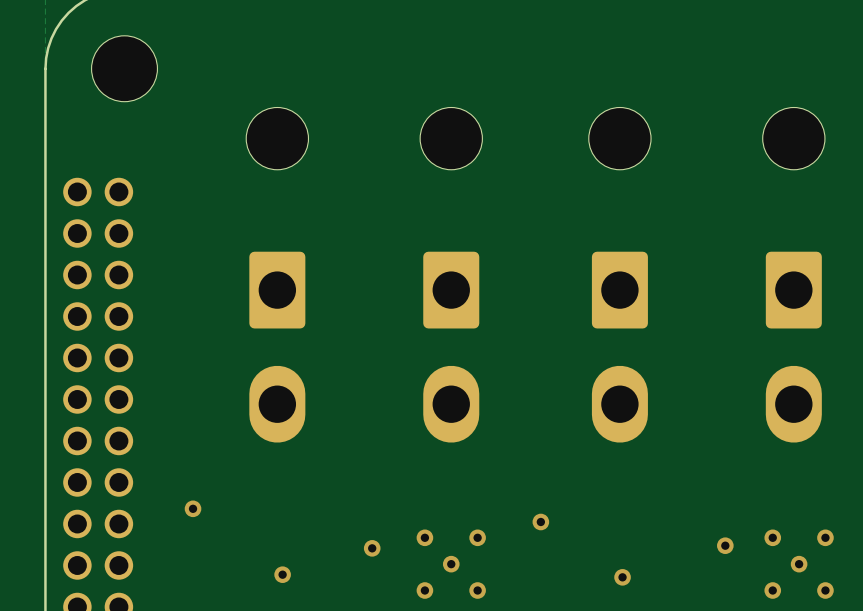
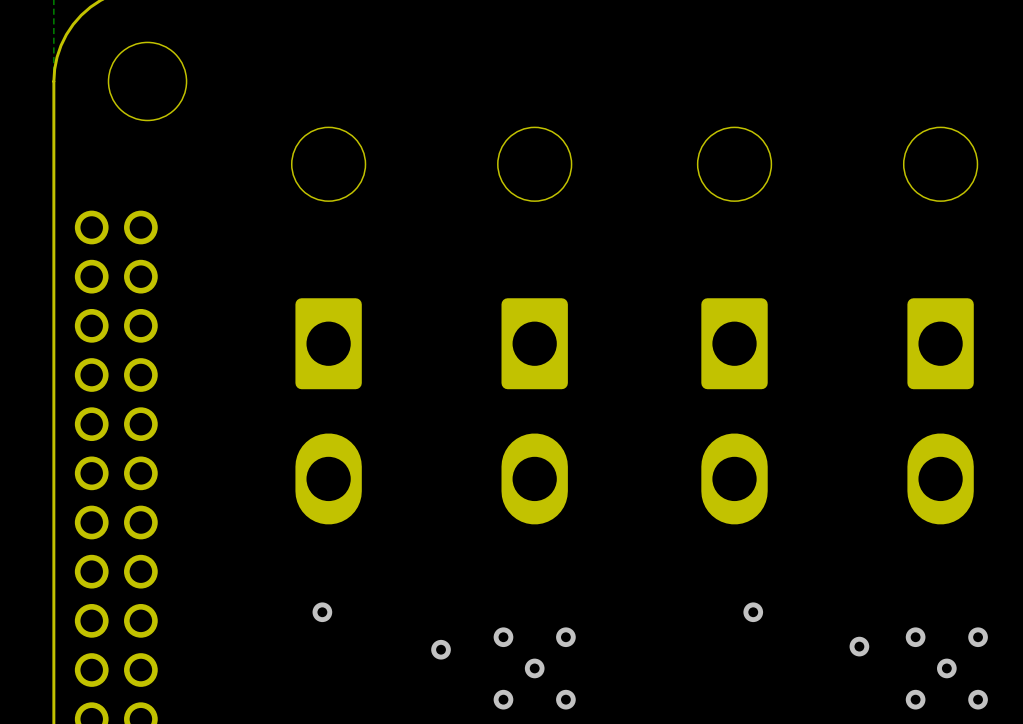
via: (193, 508) -> none
via: none -> (322, 612)
via: none -> (753, 612)
via: (540, 521) -> none
via: (282, 574) -> none
via: (622, 577) -> none

